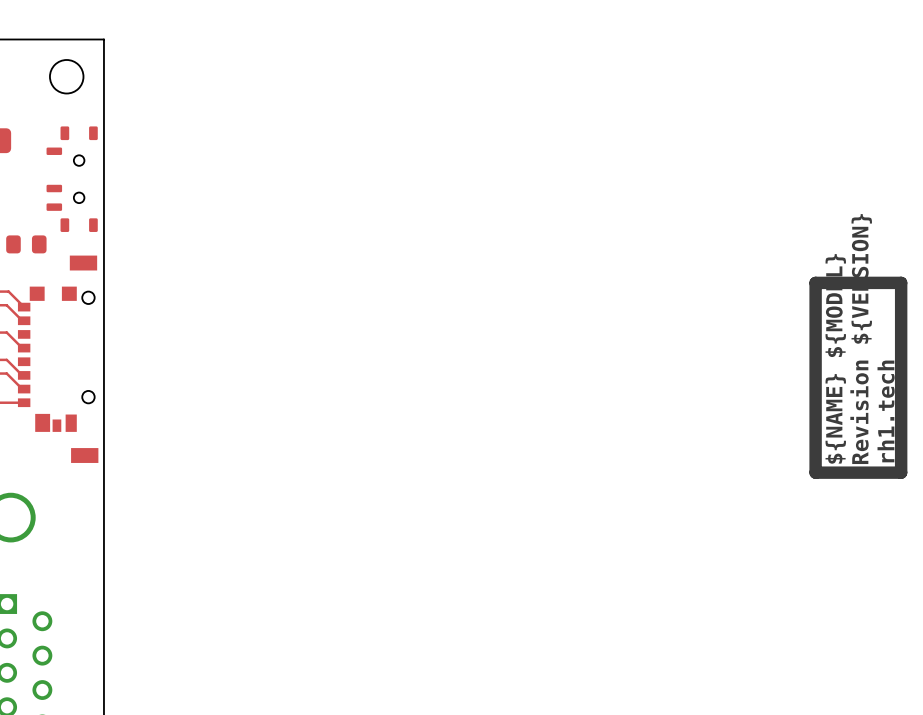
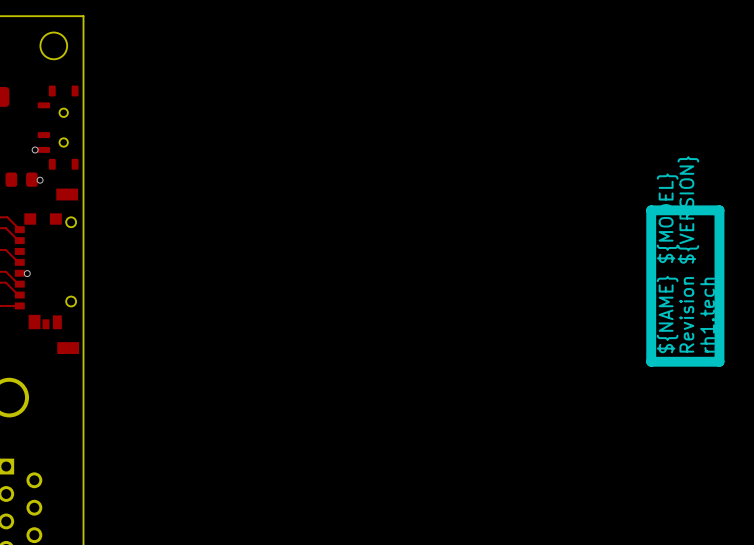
via: none -> (35, 150)
via: none -> (40, 180)
via: none -> (27, 273)

